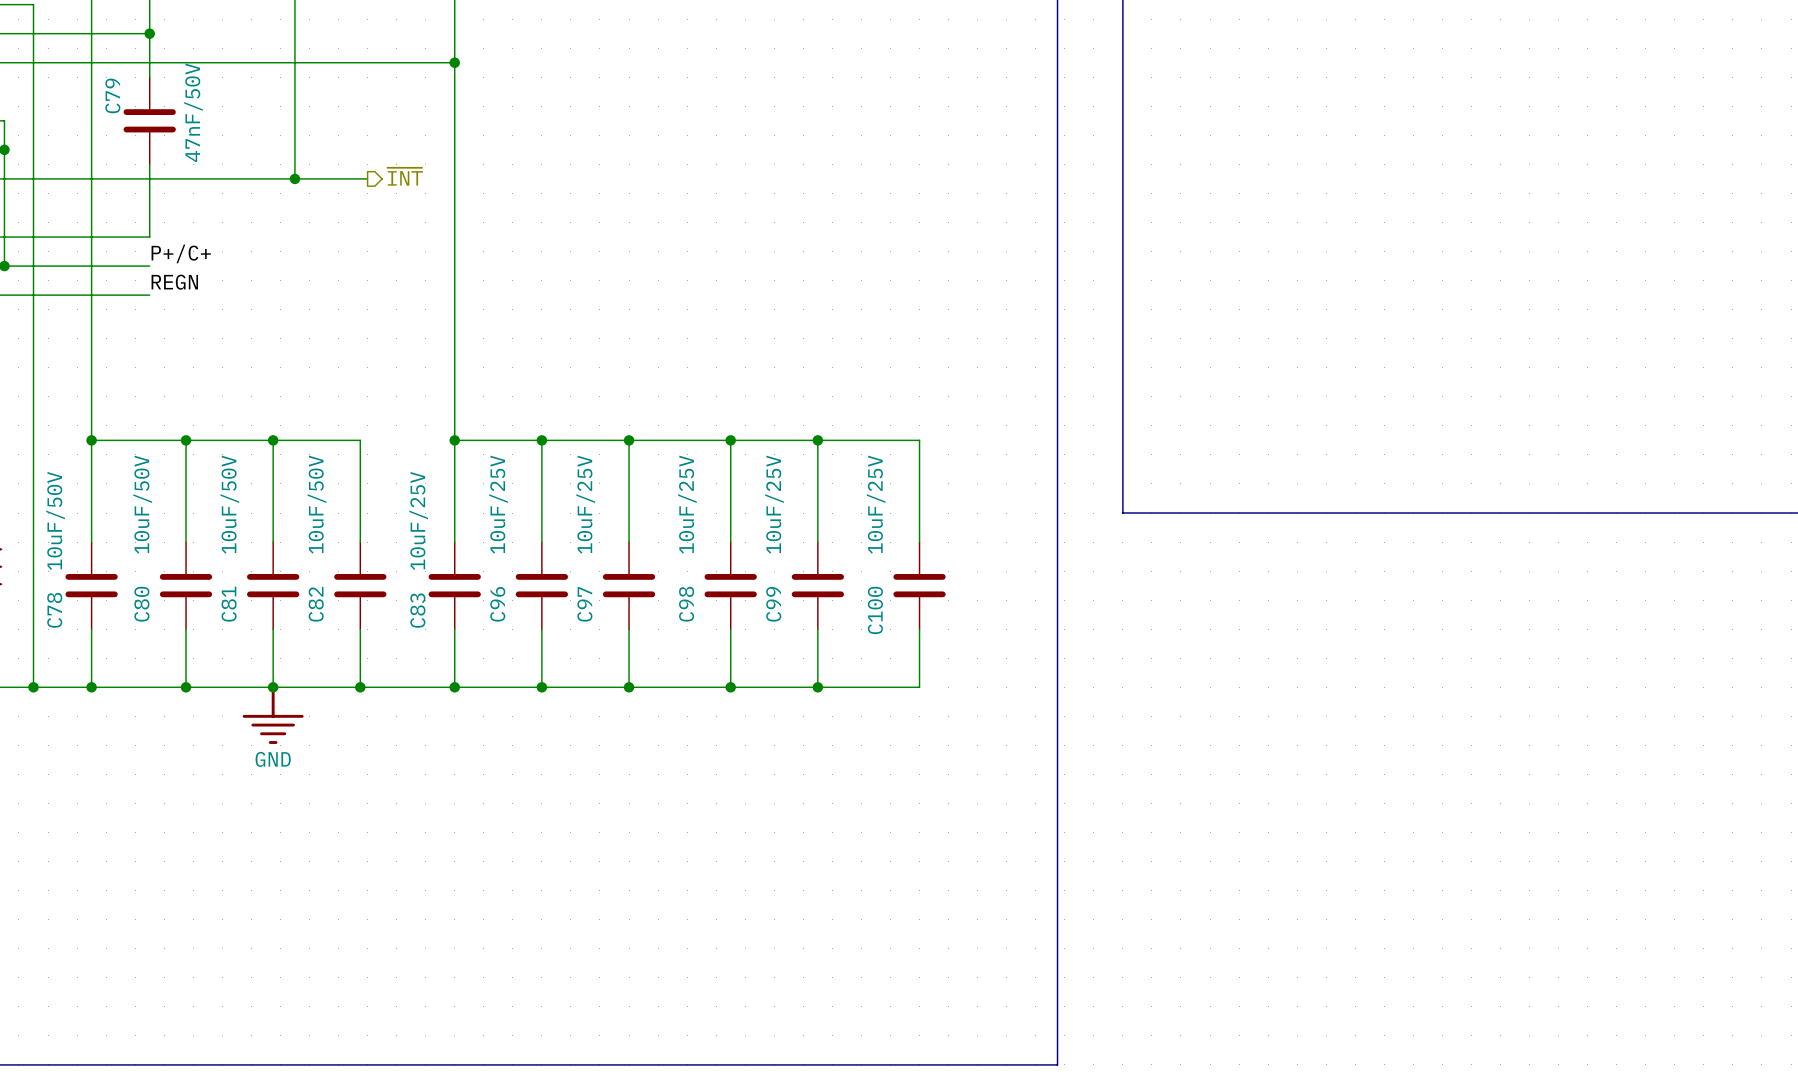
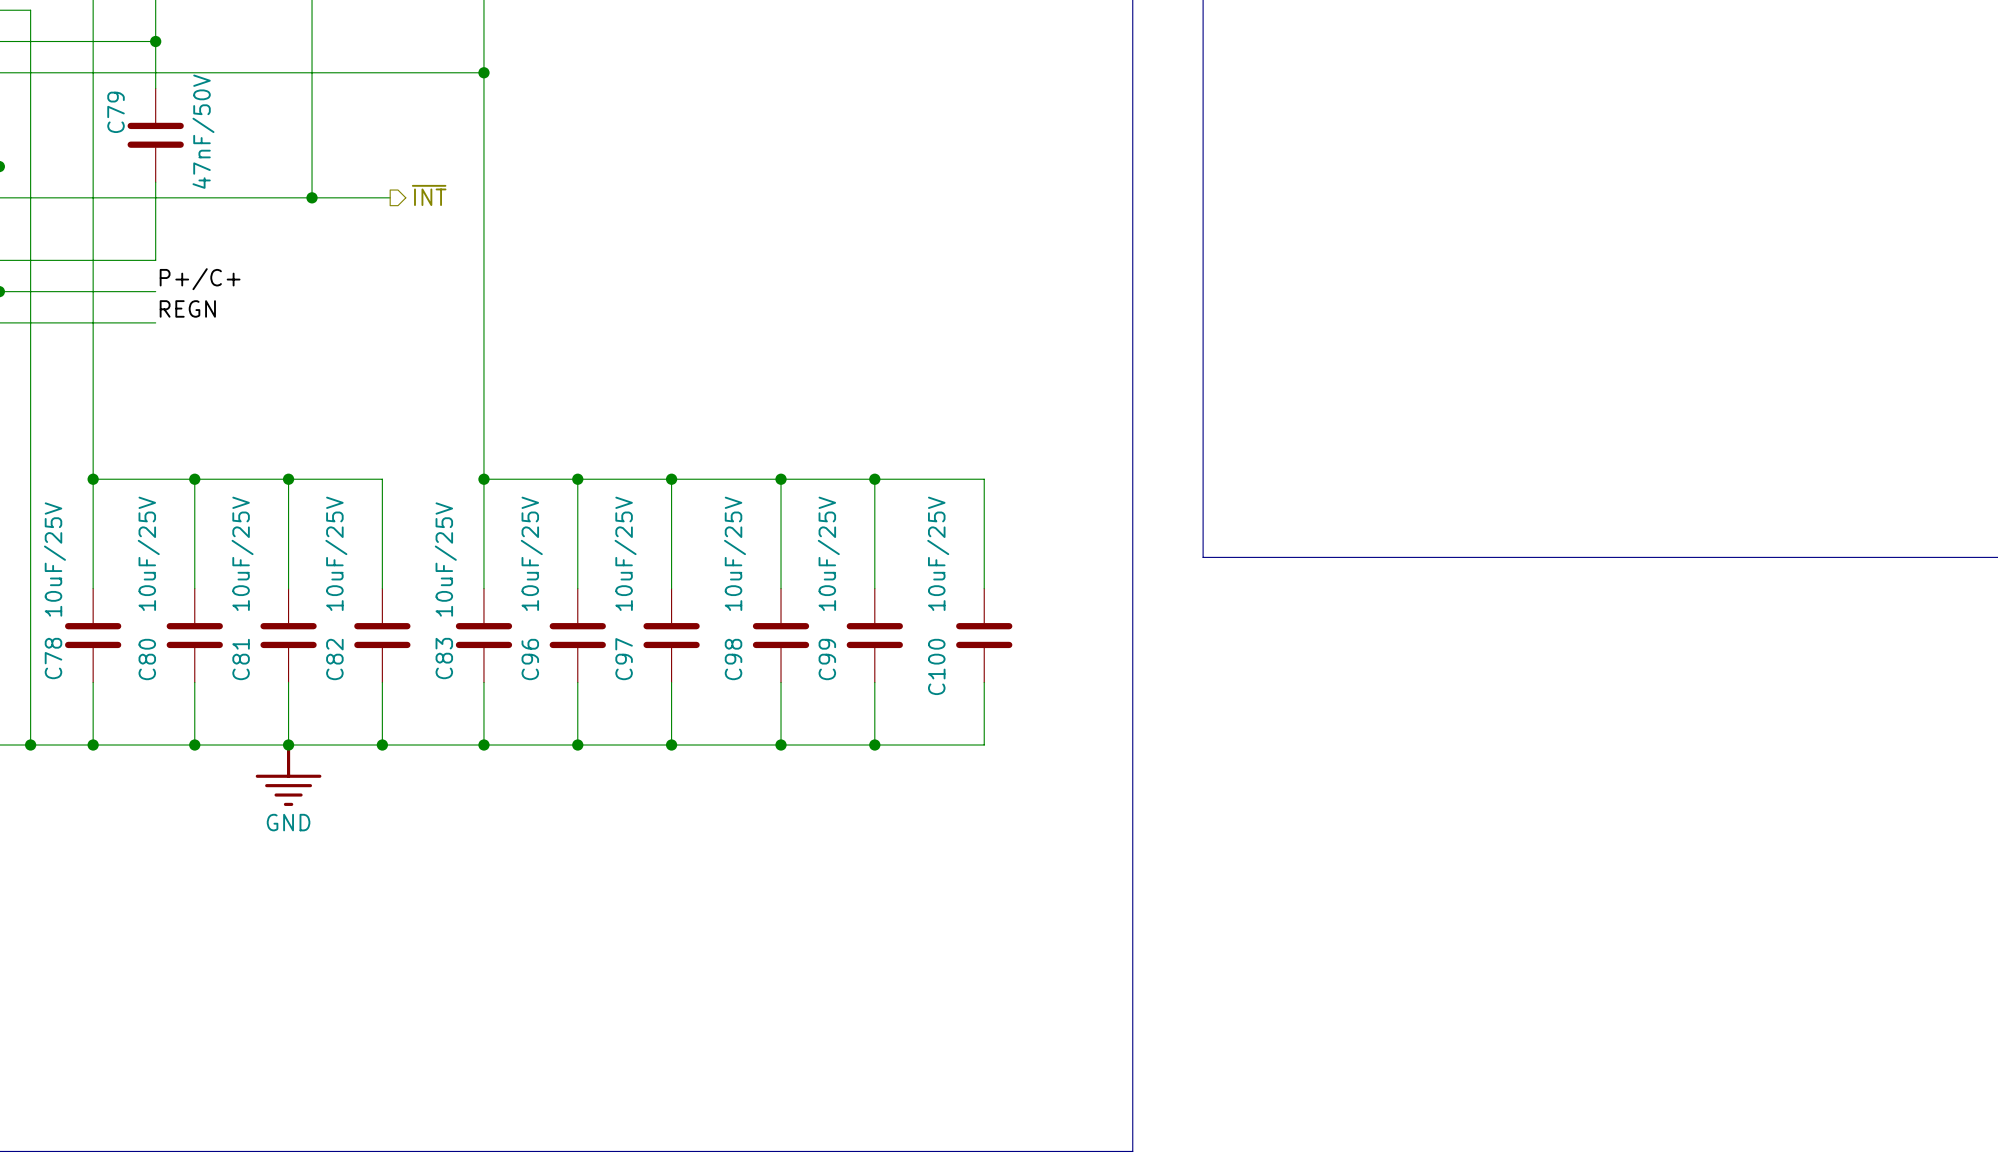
C80 value: 10uF/50V (142, 504) -> 10uF/25V (148, 553)
C81 value: 10uF/50V (229, 504) -> 10uF/25V (242, 553)
C82 value: 10uF/50V (316, 504) -> 10uF/25V (336, 553)
C78 value: 10uF/50V (55, 520) -> 10uF/25V (54, 559)

